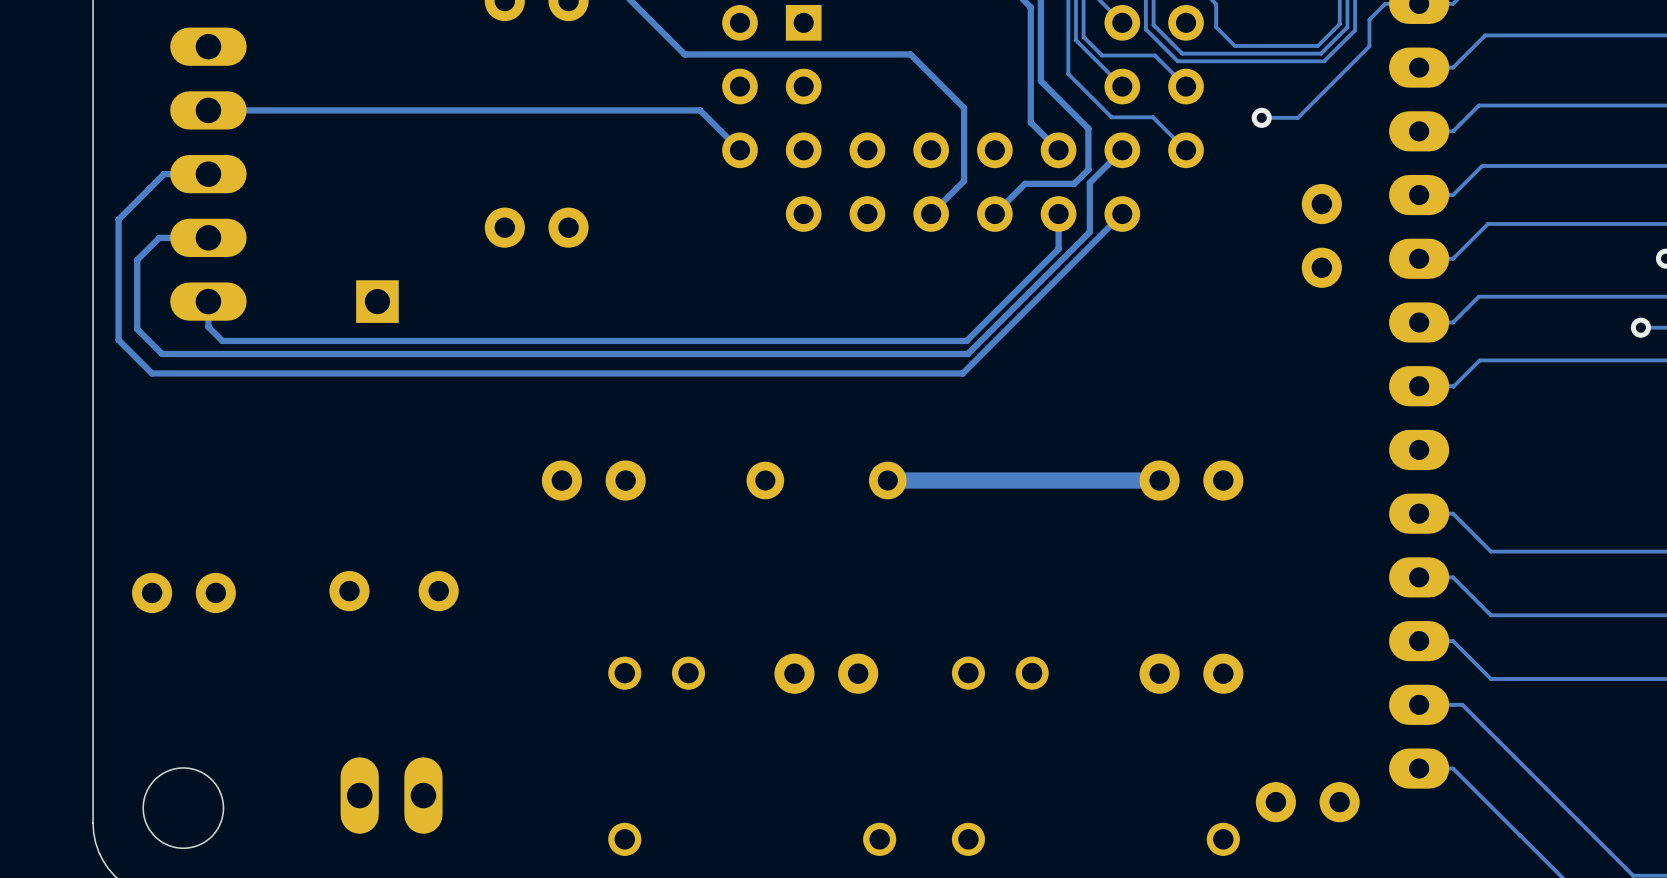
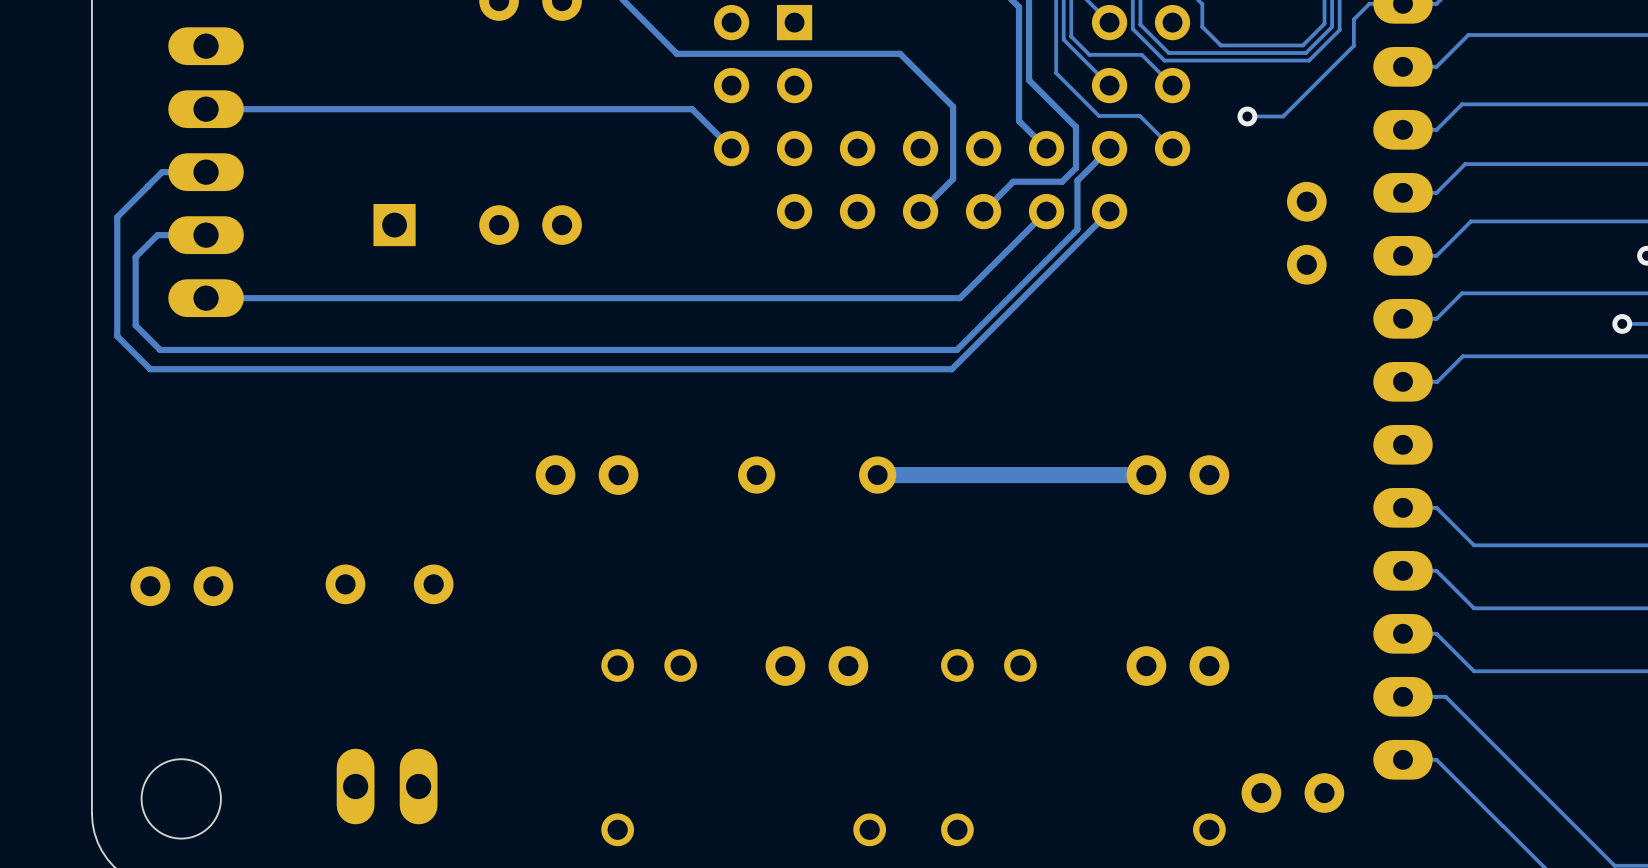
track: (1058, 214) (1058, 249) (966, 340) (222, 340) (208, 326) (208, 301) -> (1046, 211) (959, 298) (206, 298)
part position: (377, 301) -> (394, 225)

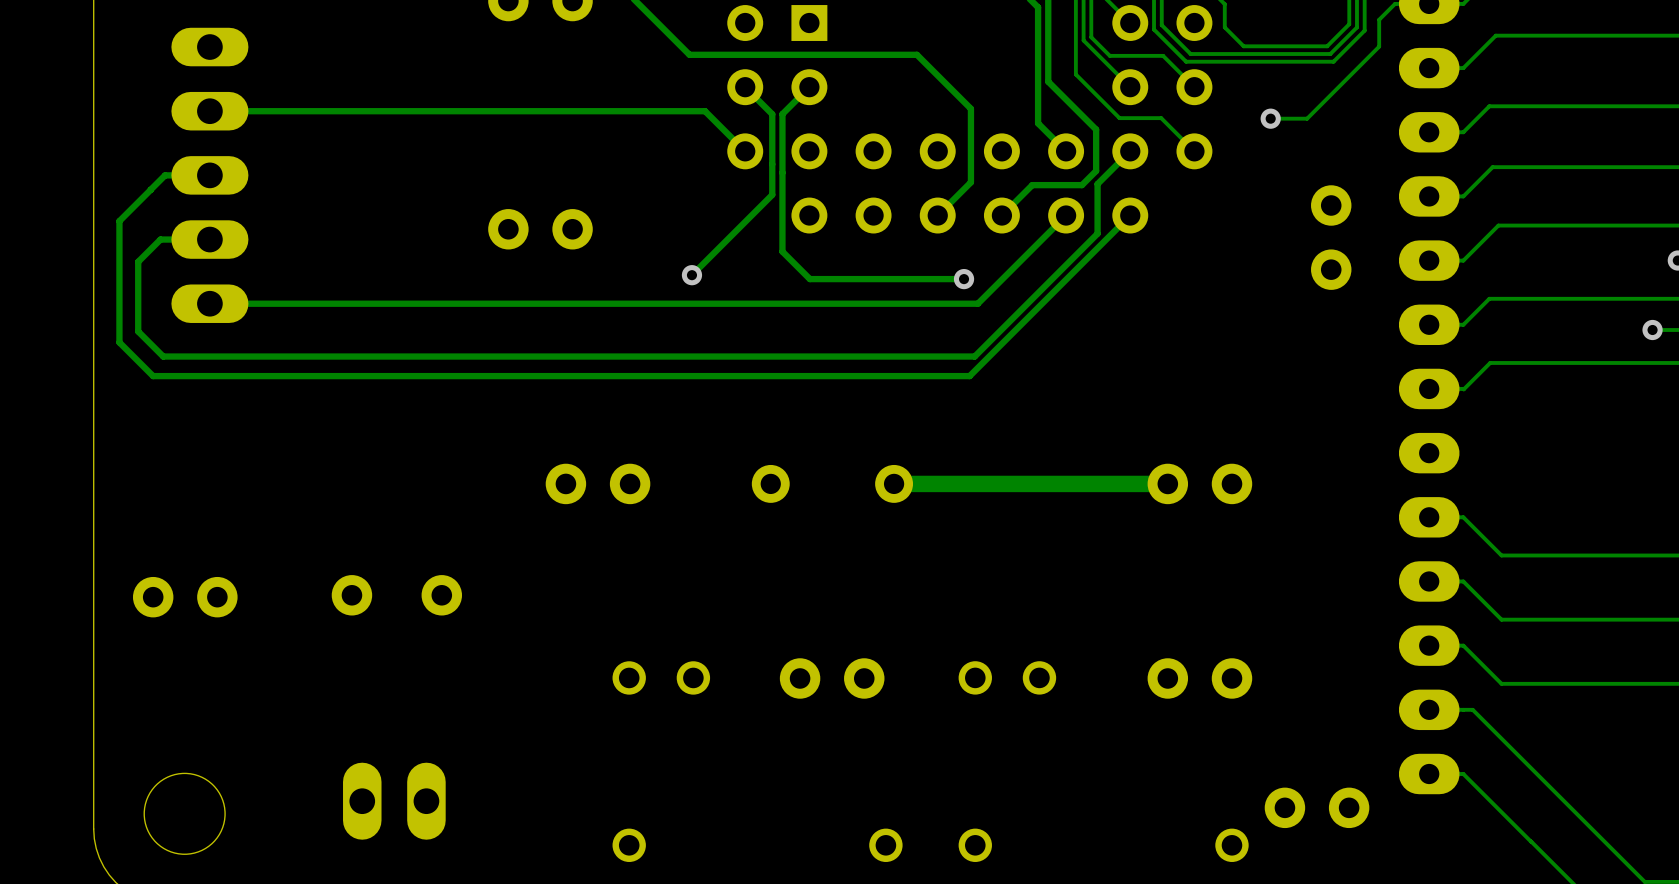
track: none -> (745, 87) (772, 114) (772, 194) (691, 275)
track: none -> (809, 87) (782, 114) (782, 251) (809, 279) (964, 279)
part: (394, 225) -> none
via: none -> (691, 275)
via: none -> (964, 279)

